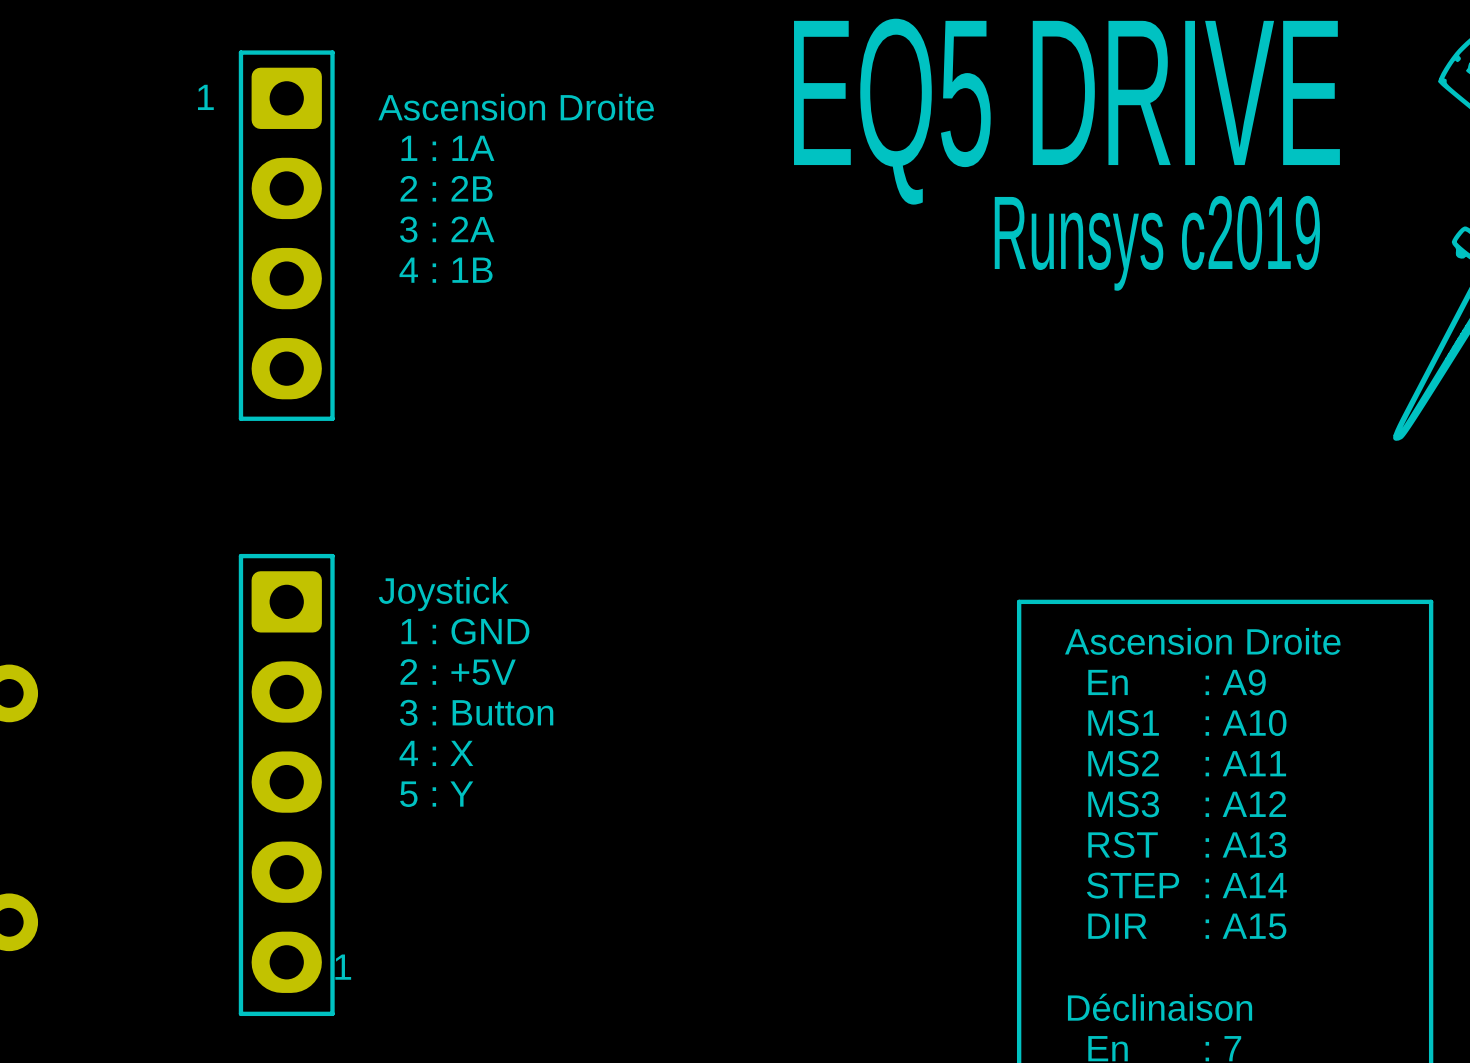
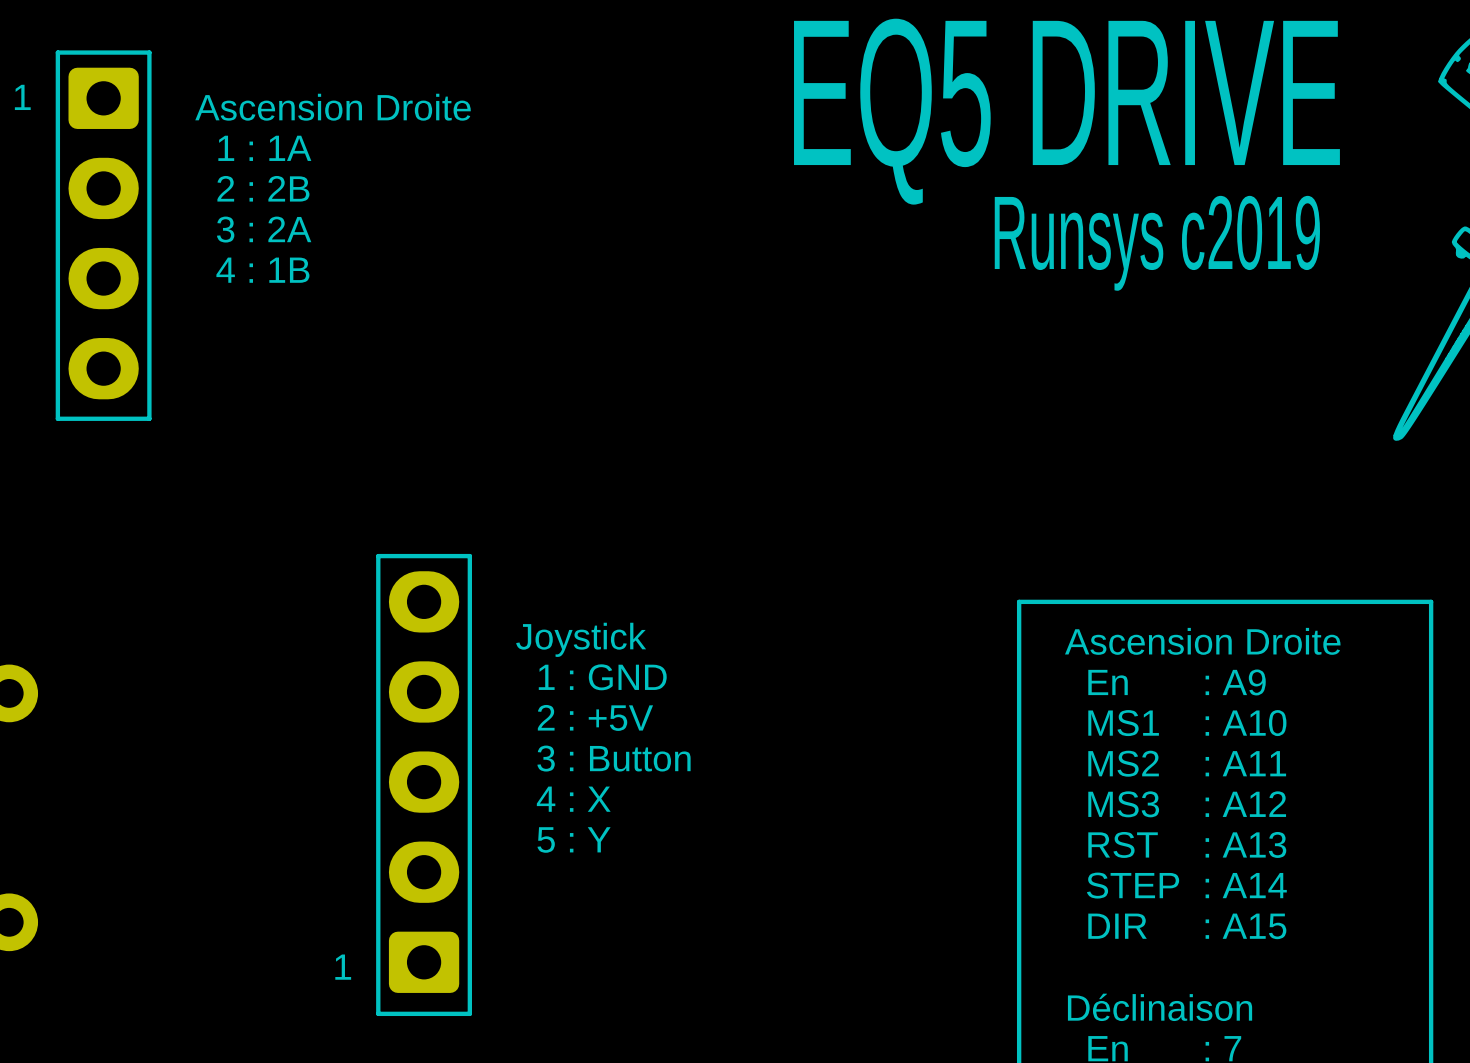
line: (332, 52) (332, 418) (240, 418) (240, 52) (332, 52) -> (149, 52) (149, 418) (57, 418) (57, 52) (149, 52)
text position: 1 (205, 97) -> 1 (22, 97)
text position: Ascension Droite (516, 107) -> Ascension Droite (333, 107)
text position: 1 : 1A (447, 148) -> 1 : 1A (264, 148)
text position: 2 : 2B (446, 188) -> 2 : 2B (263, 188)
text position: 3 : 2A (447, 229) -> 3 : 2A (264, 229)
part position: (286, 233) -> (103, 233)
text position: 4 : 1B (446, 270) -> 4 : 1B (262, 270)
line: (332, 556) (332, 1013) (240, 1013) (240, 556) (332, 556) -> (469, 556) (469, 1013) (378, 1013) (378, 556) (469, 556)
text position: Joystick (443, 594) -> Joystick (581, 639)
text position: 1 : GND (465, 631) -> 1 : GND (602, 677)
text position: 2 : +5V (458, 672) -> 2 : +5V (595, 717)
text position: 3 : Button (476, 712) -> 3 : Button (614, 758)
text position: 4 : X (436, 753) -> 4 : X (573, 799)
part rotation: 0° (286, 782) -> 180° (424, 782)
text position: 5 : Y (436, 794) -> 5 : Y (574, 839)

